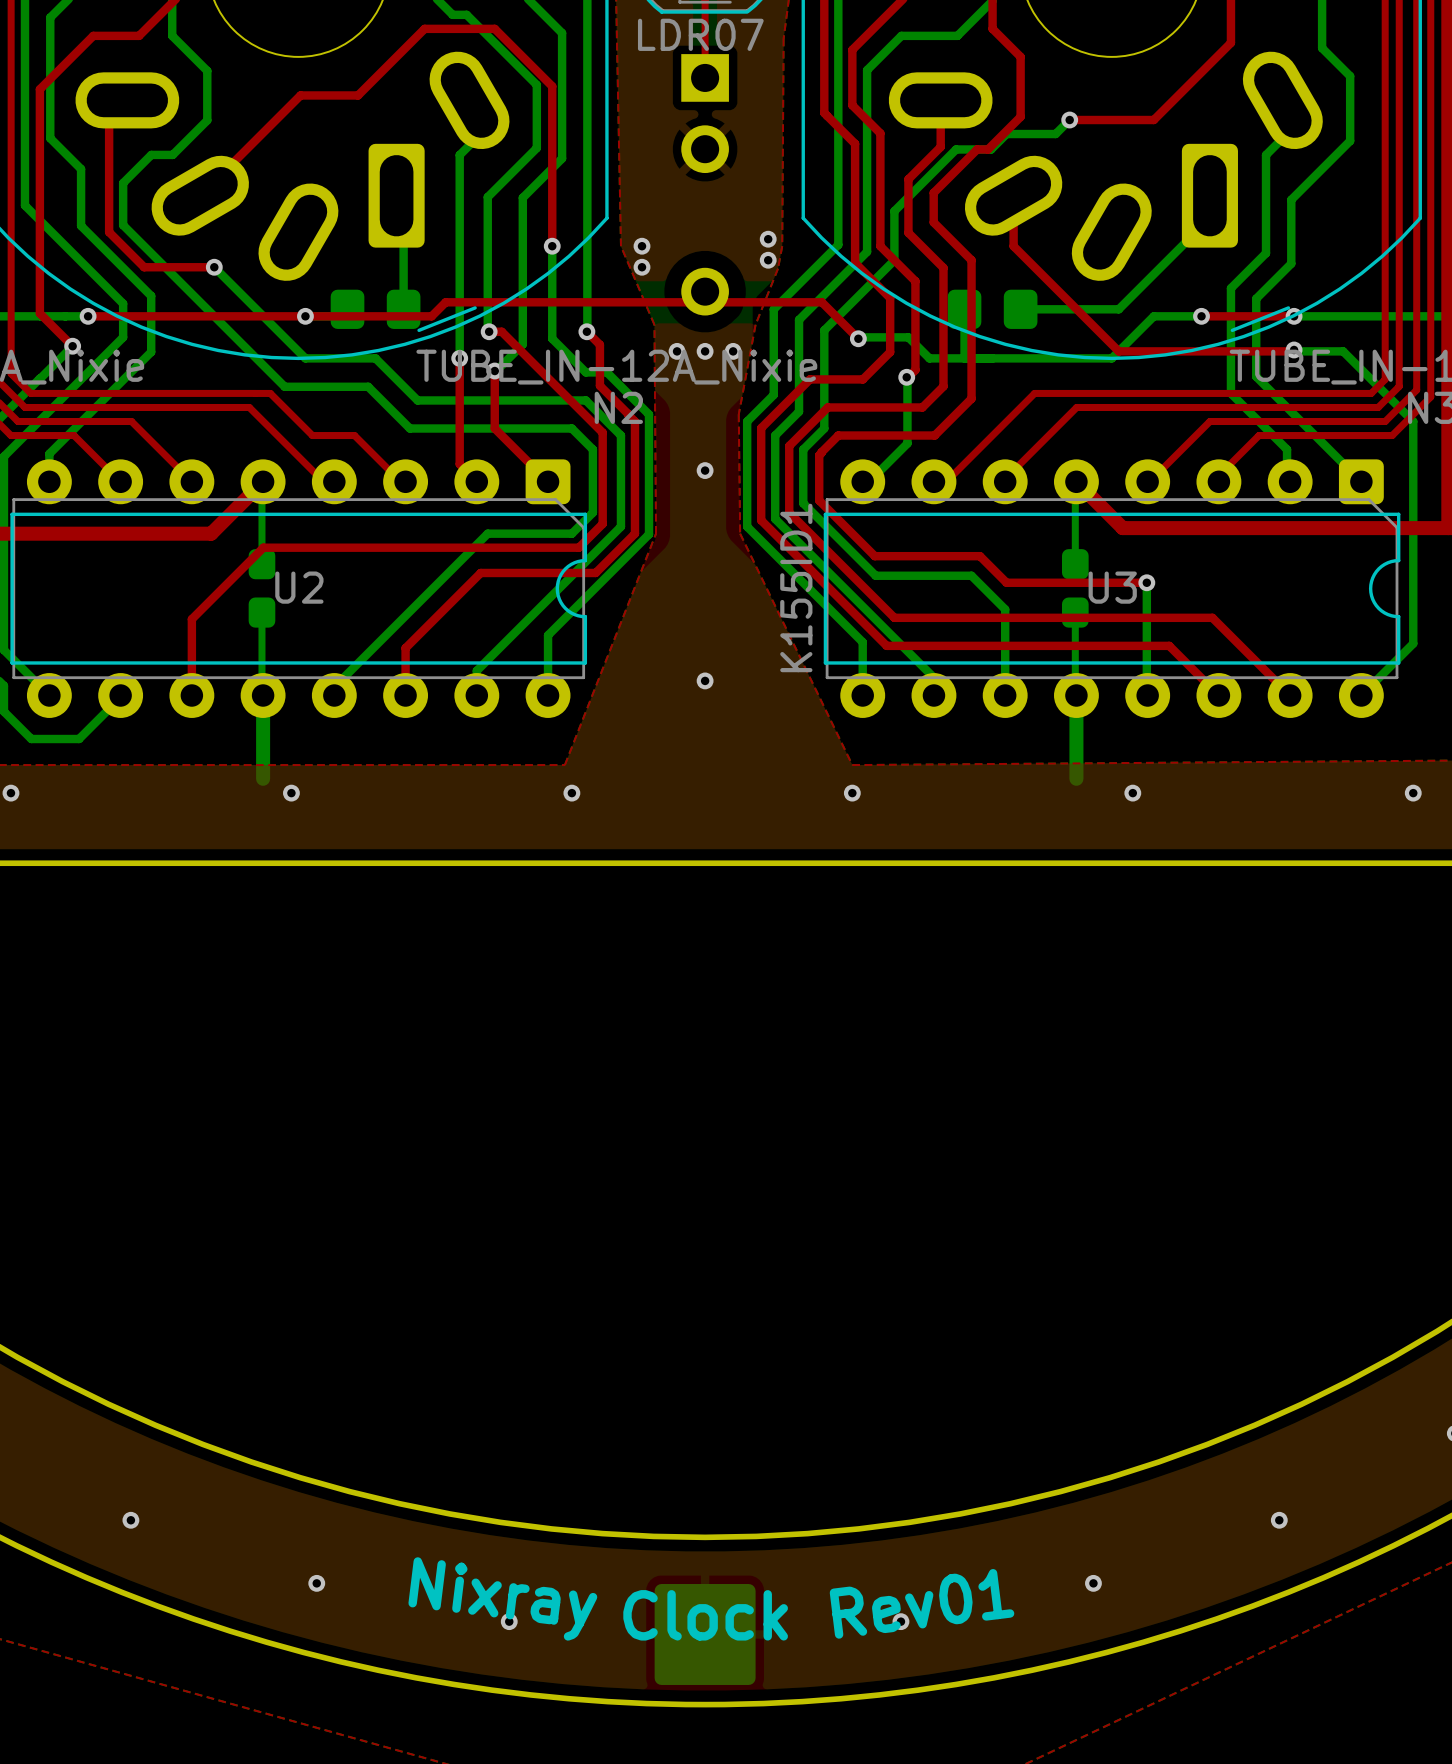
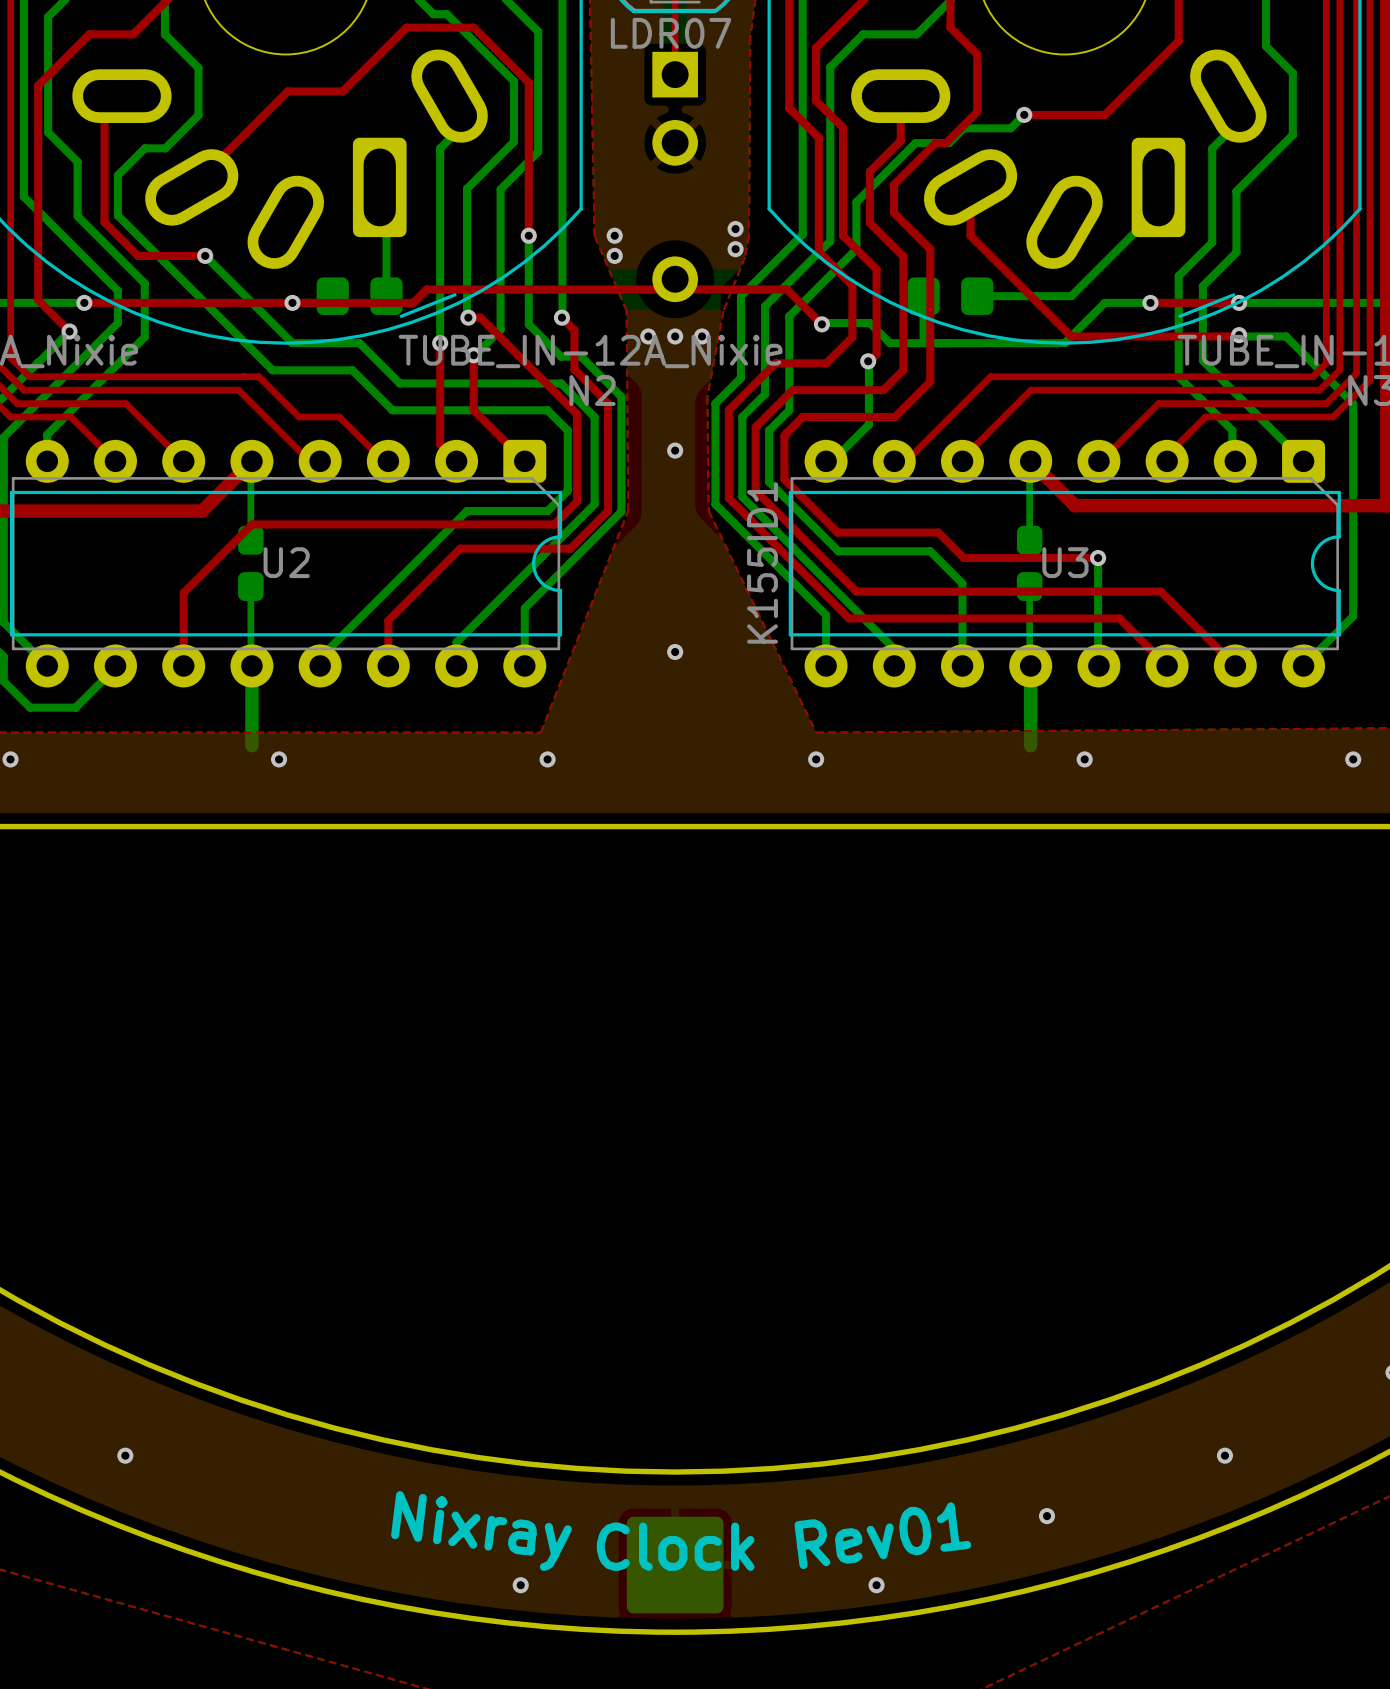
via: (316, 1583) -> none
via position: (509, 1621) -> (520, 1585)
via position: (900, 1621) -> (876, 1585)

